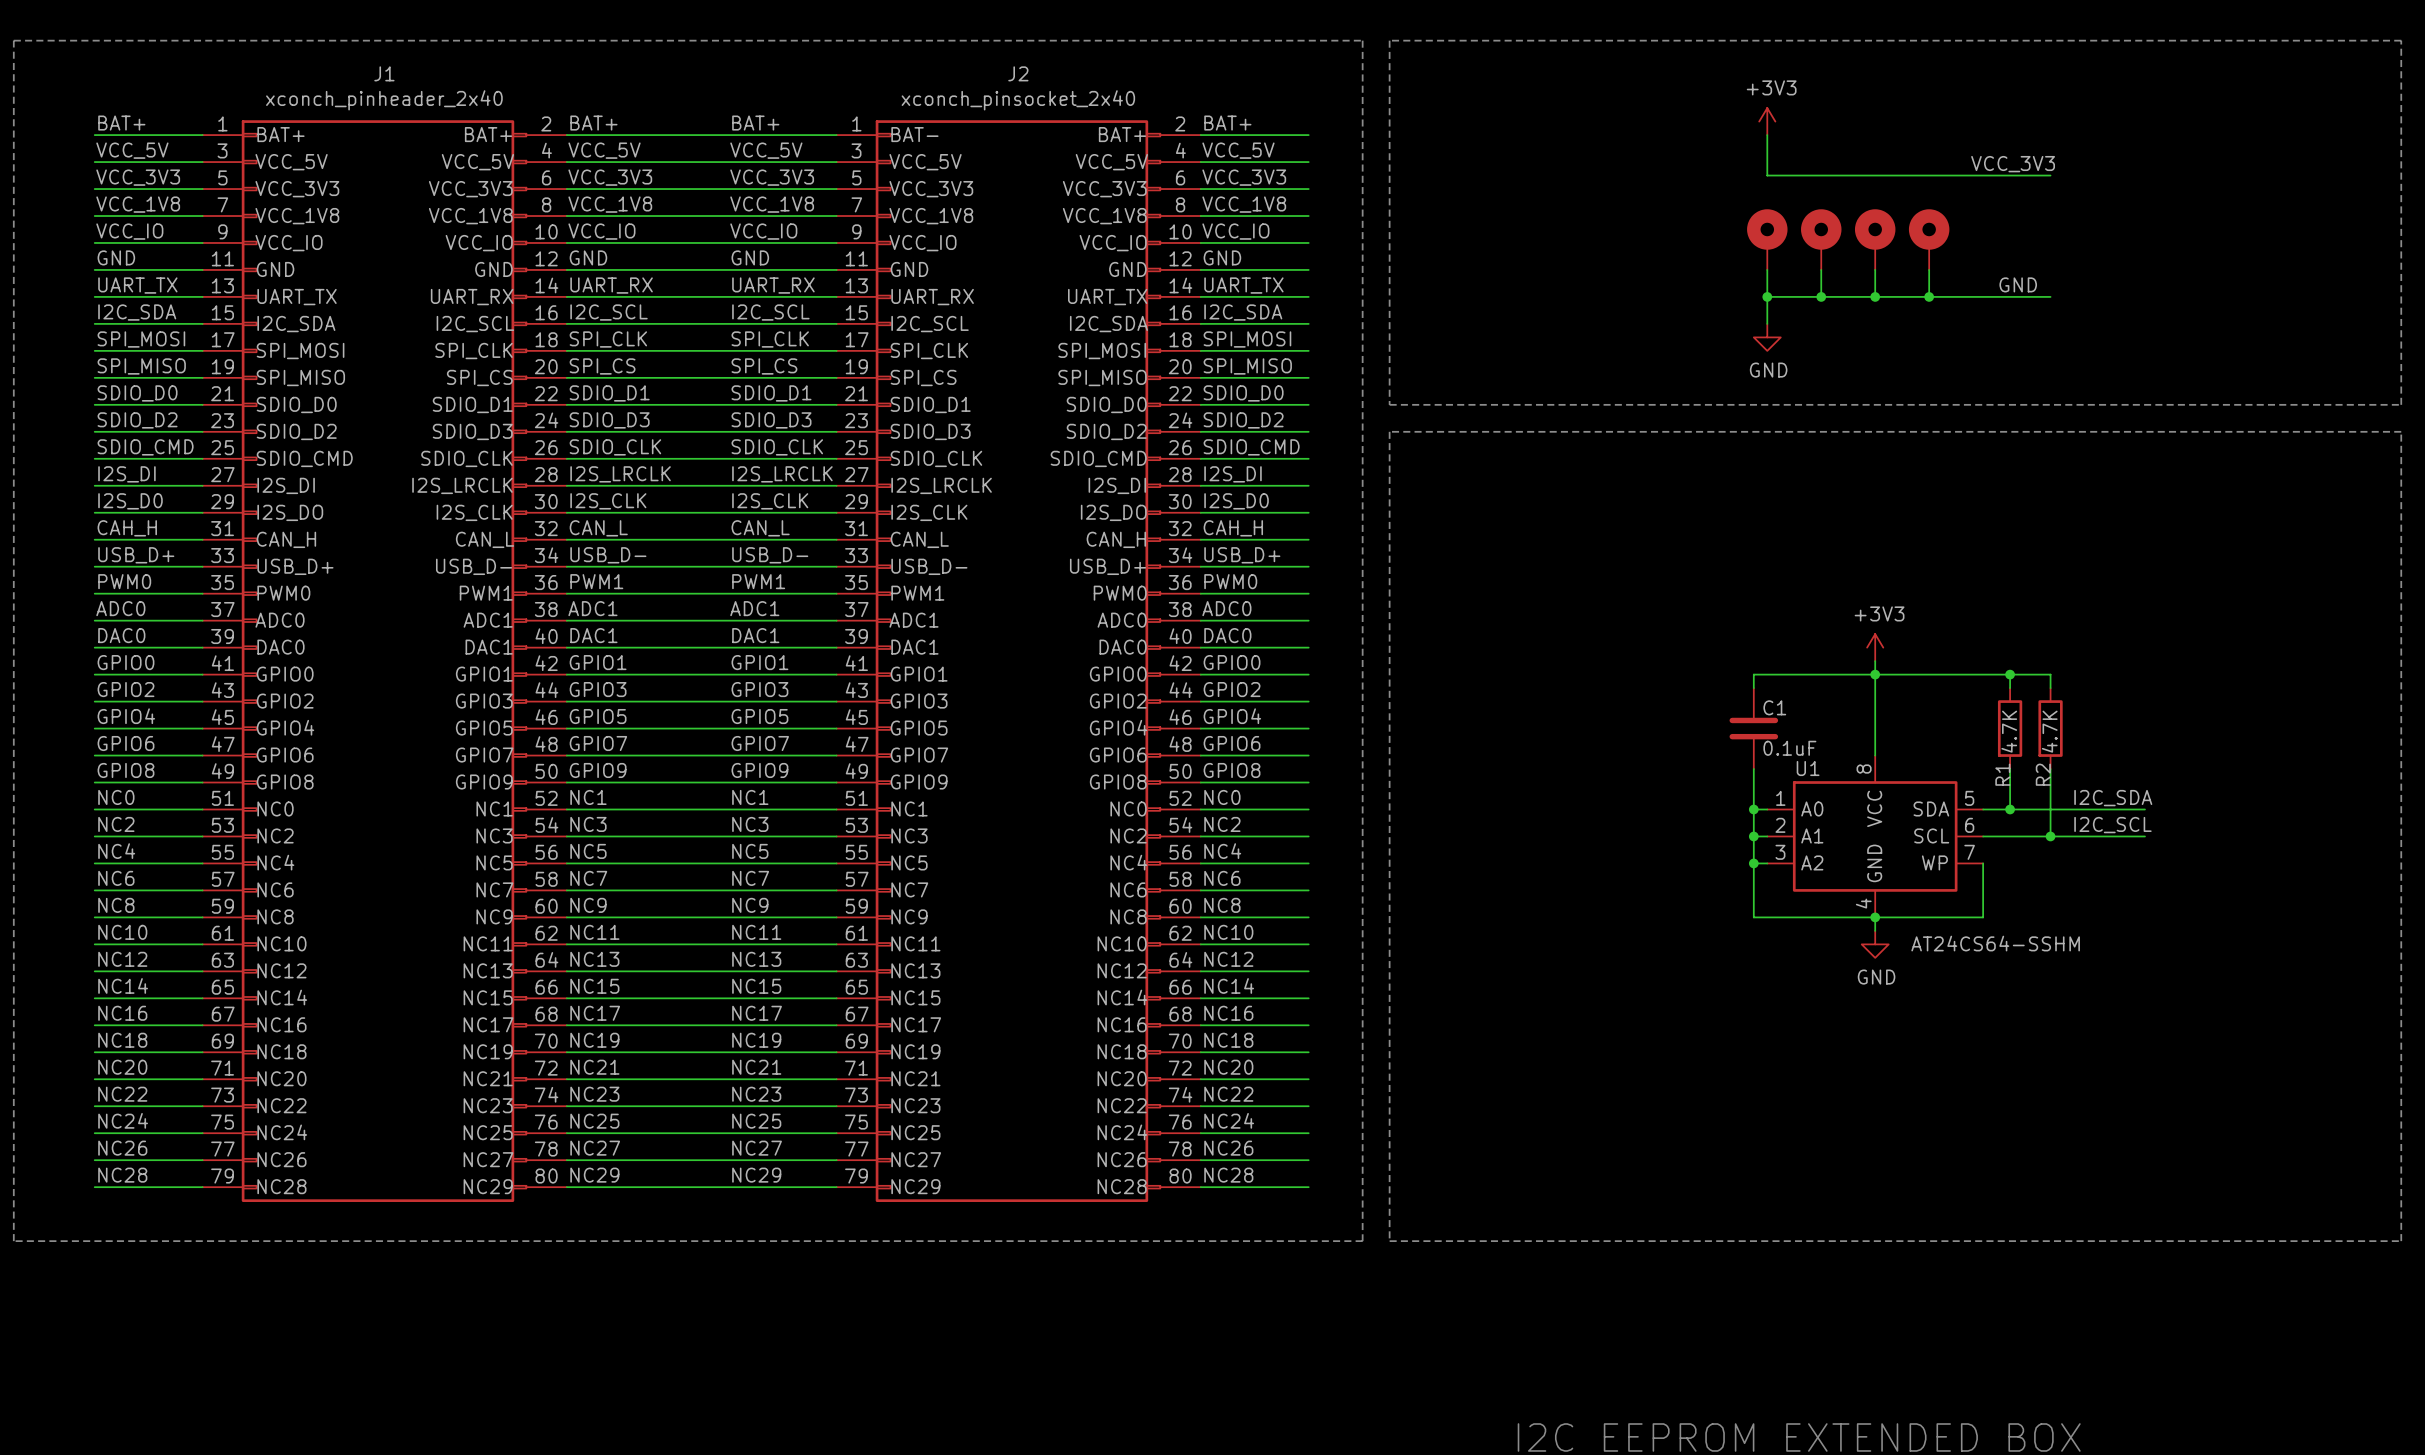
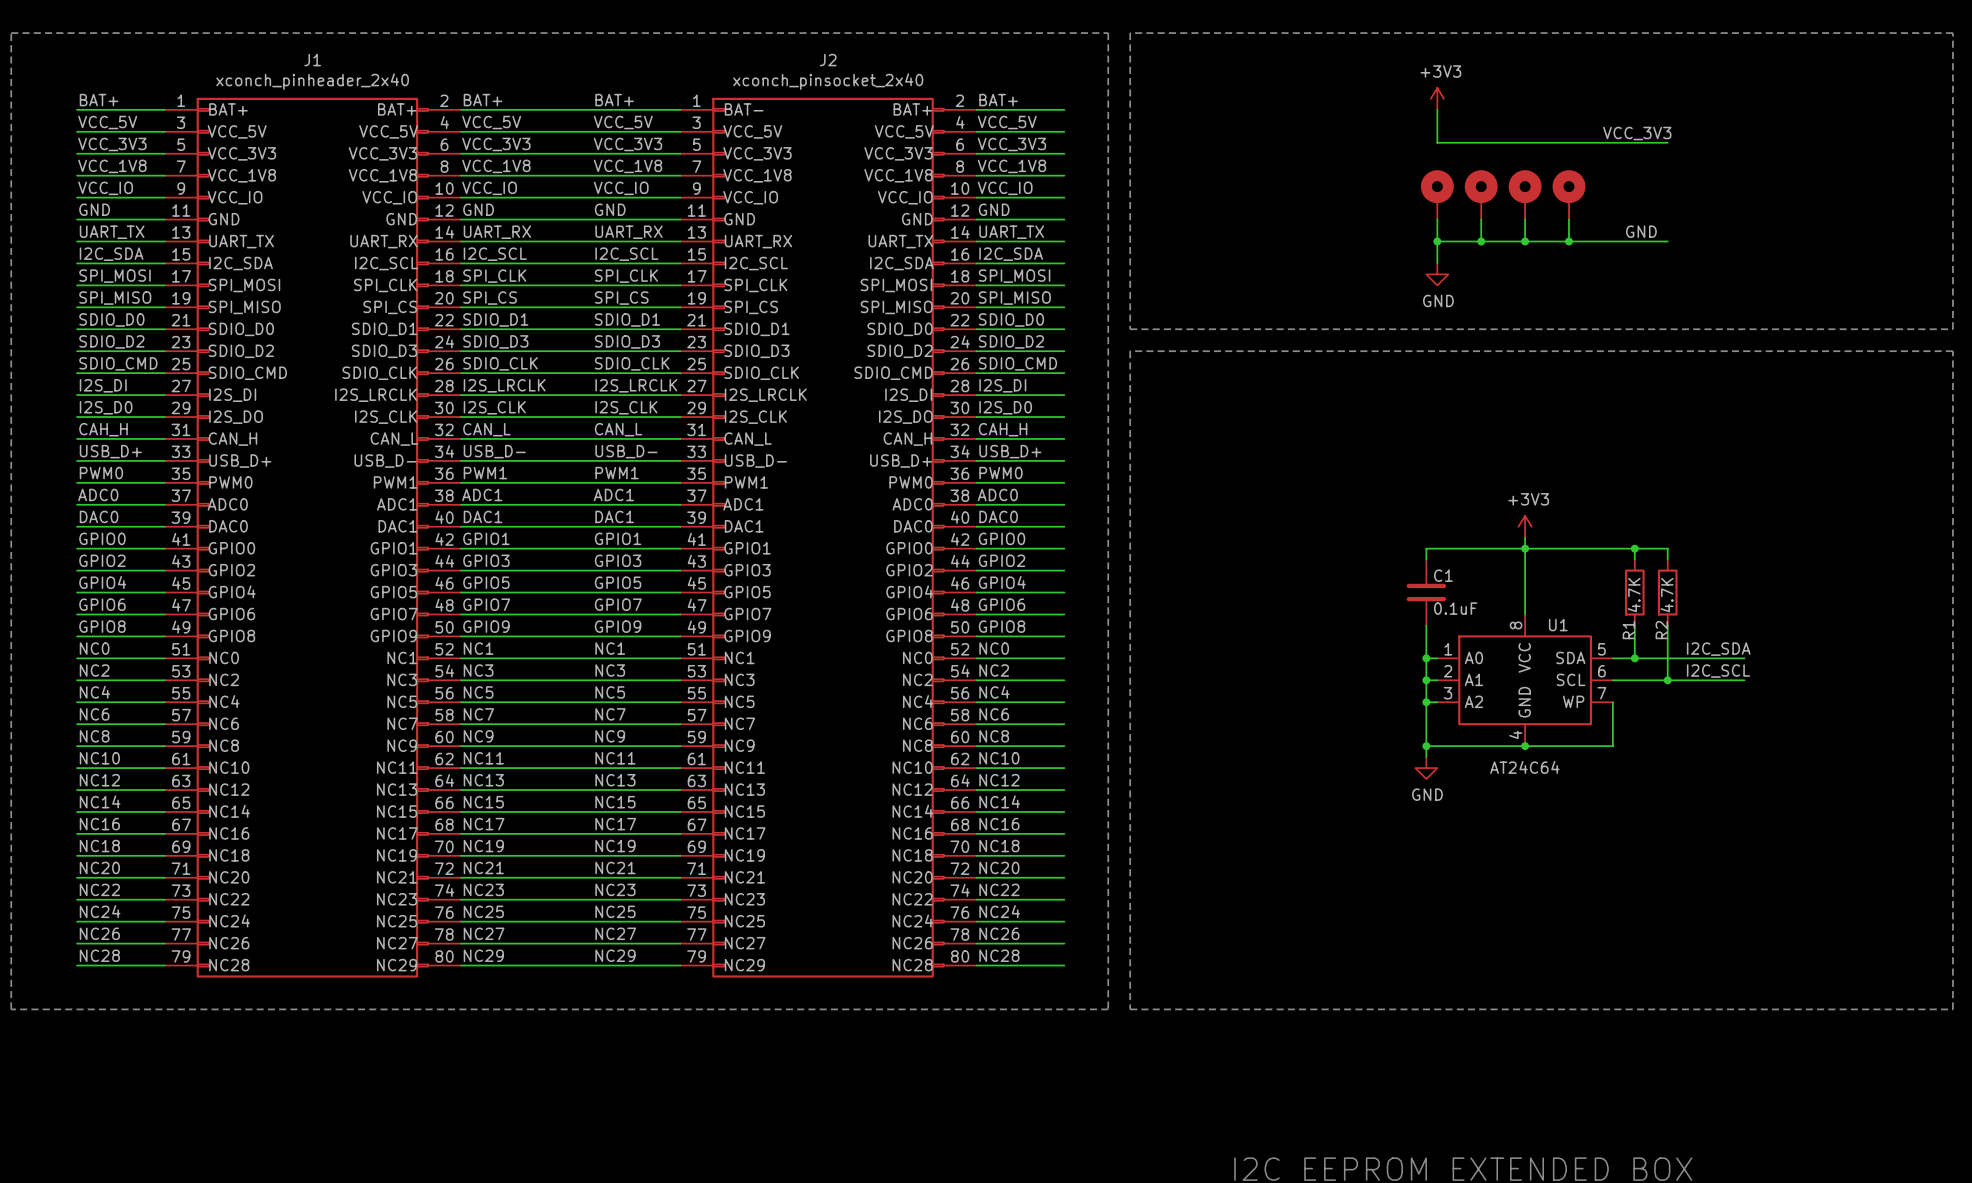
U1 name position: U1 (1808, 768) -> U1 (1558, 625)
junction: none -> (1426, 746)
wire: (1875, 917) (1875, 930) -> (1426, 746) (1426, 757)
U1 value: AT24CS64-SSHM (1995, 943) -> AT24C64 (1524, 767)
power symbol position: GND (1875, 944) -> GND (1426, 768)

